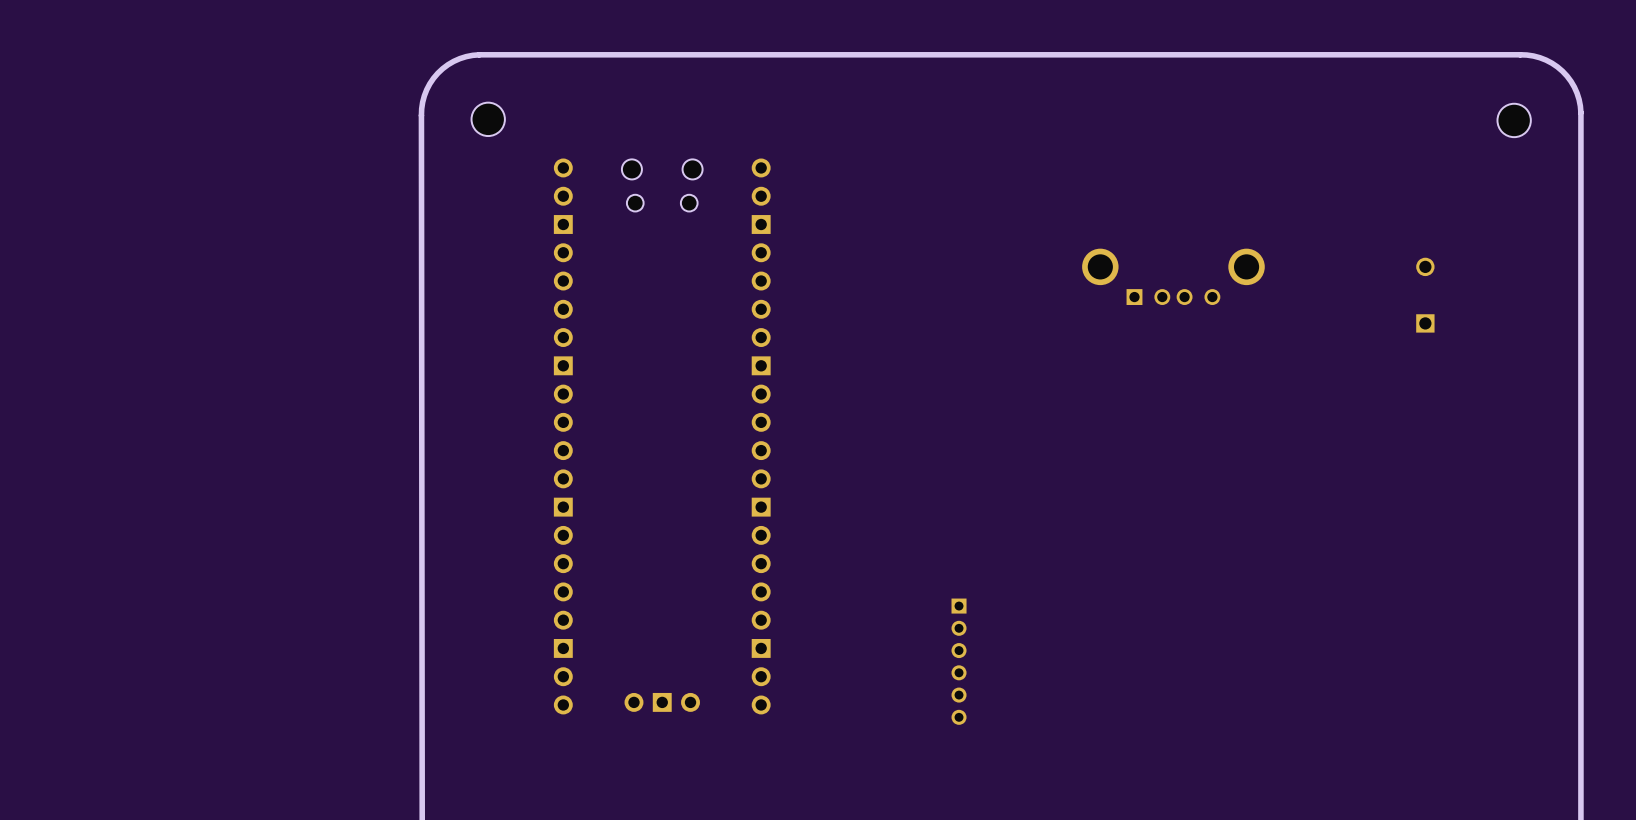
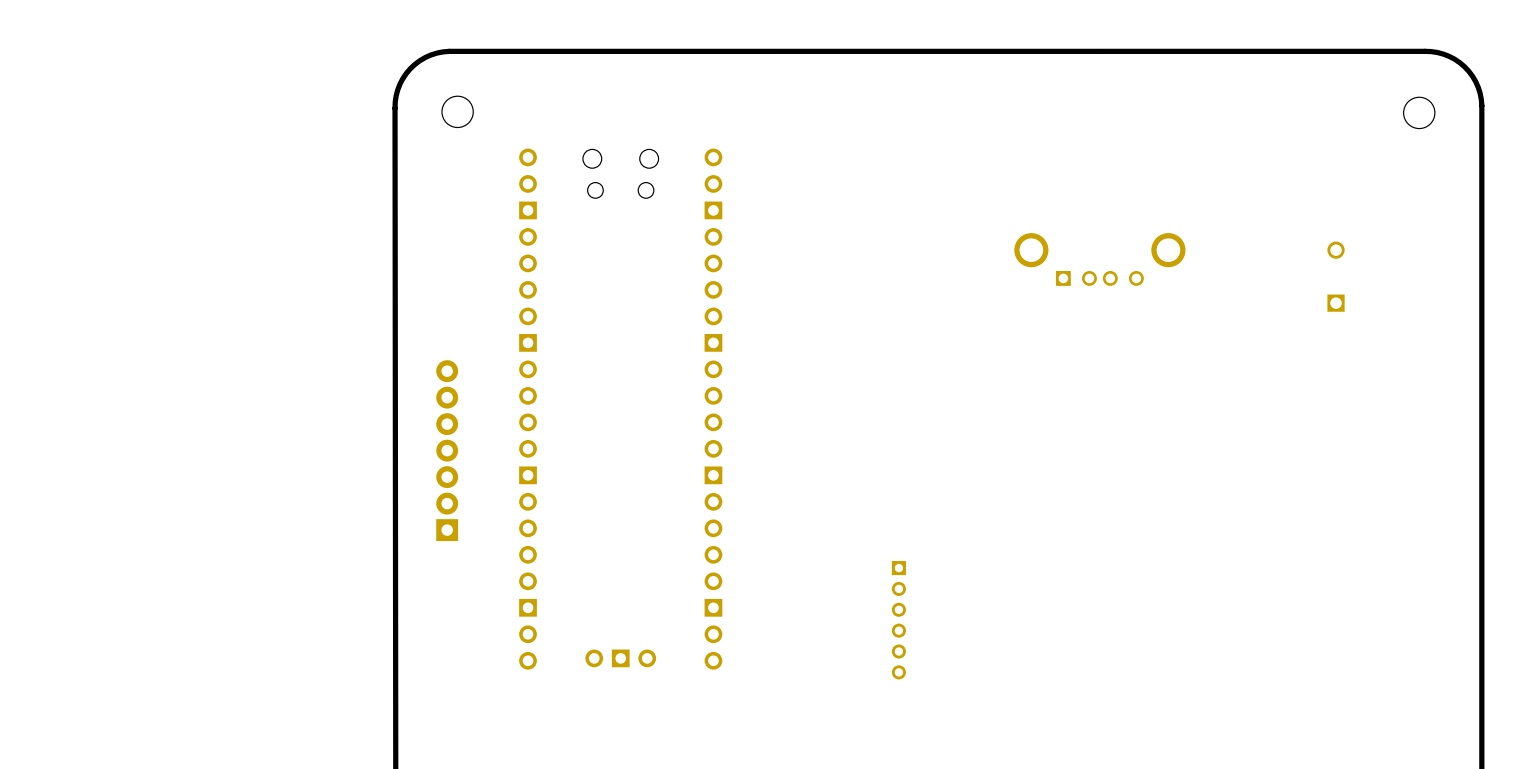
part: none -> (447, 450)

